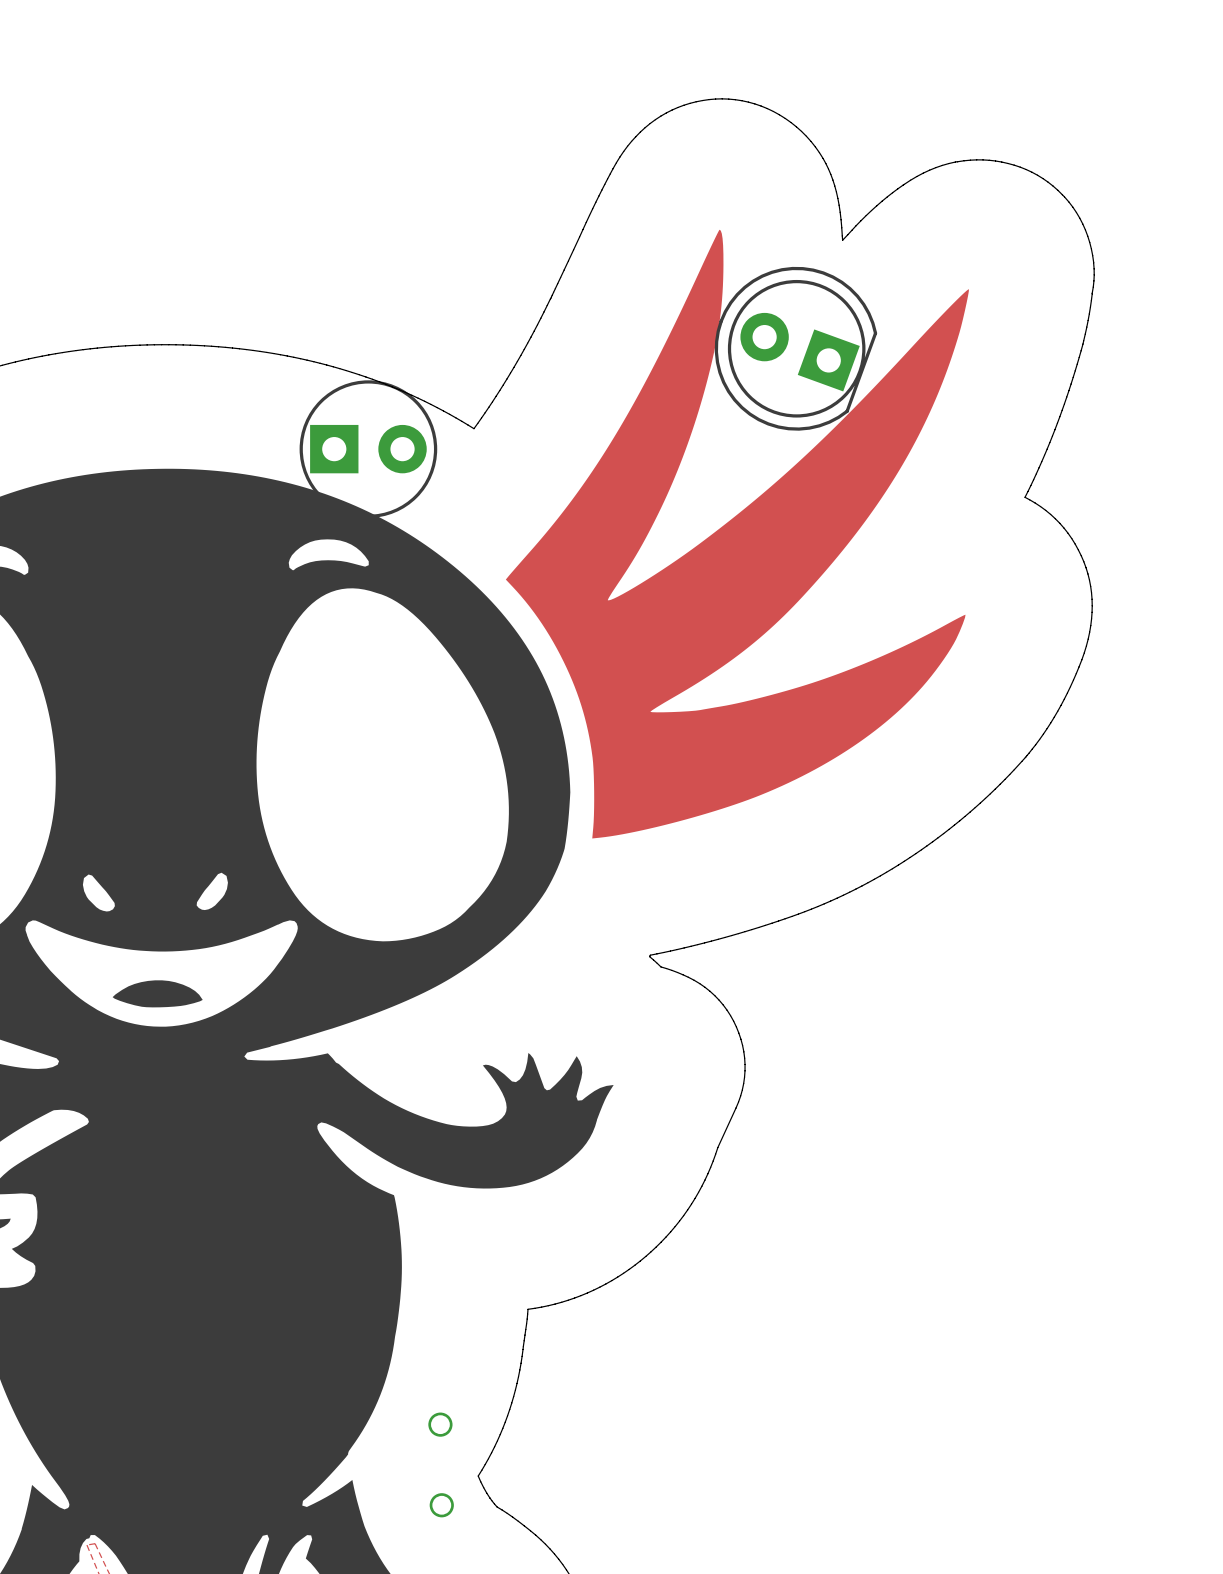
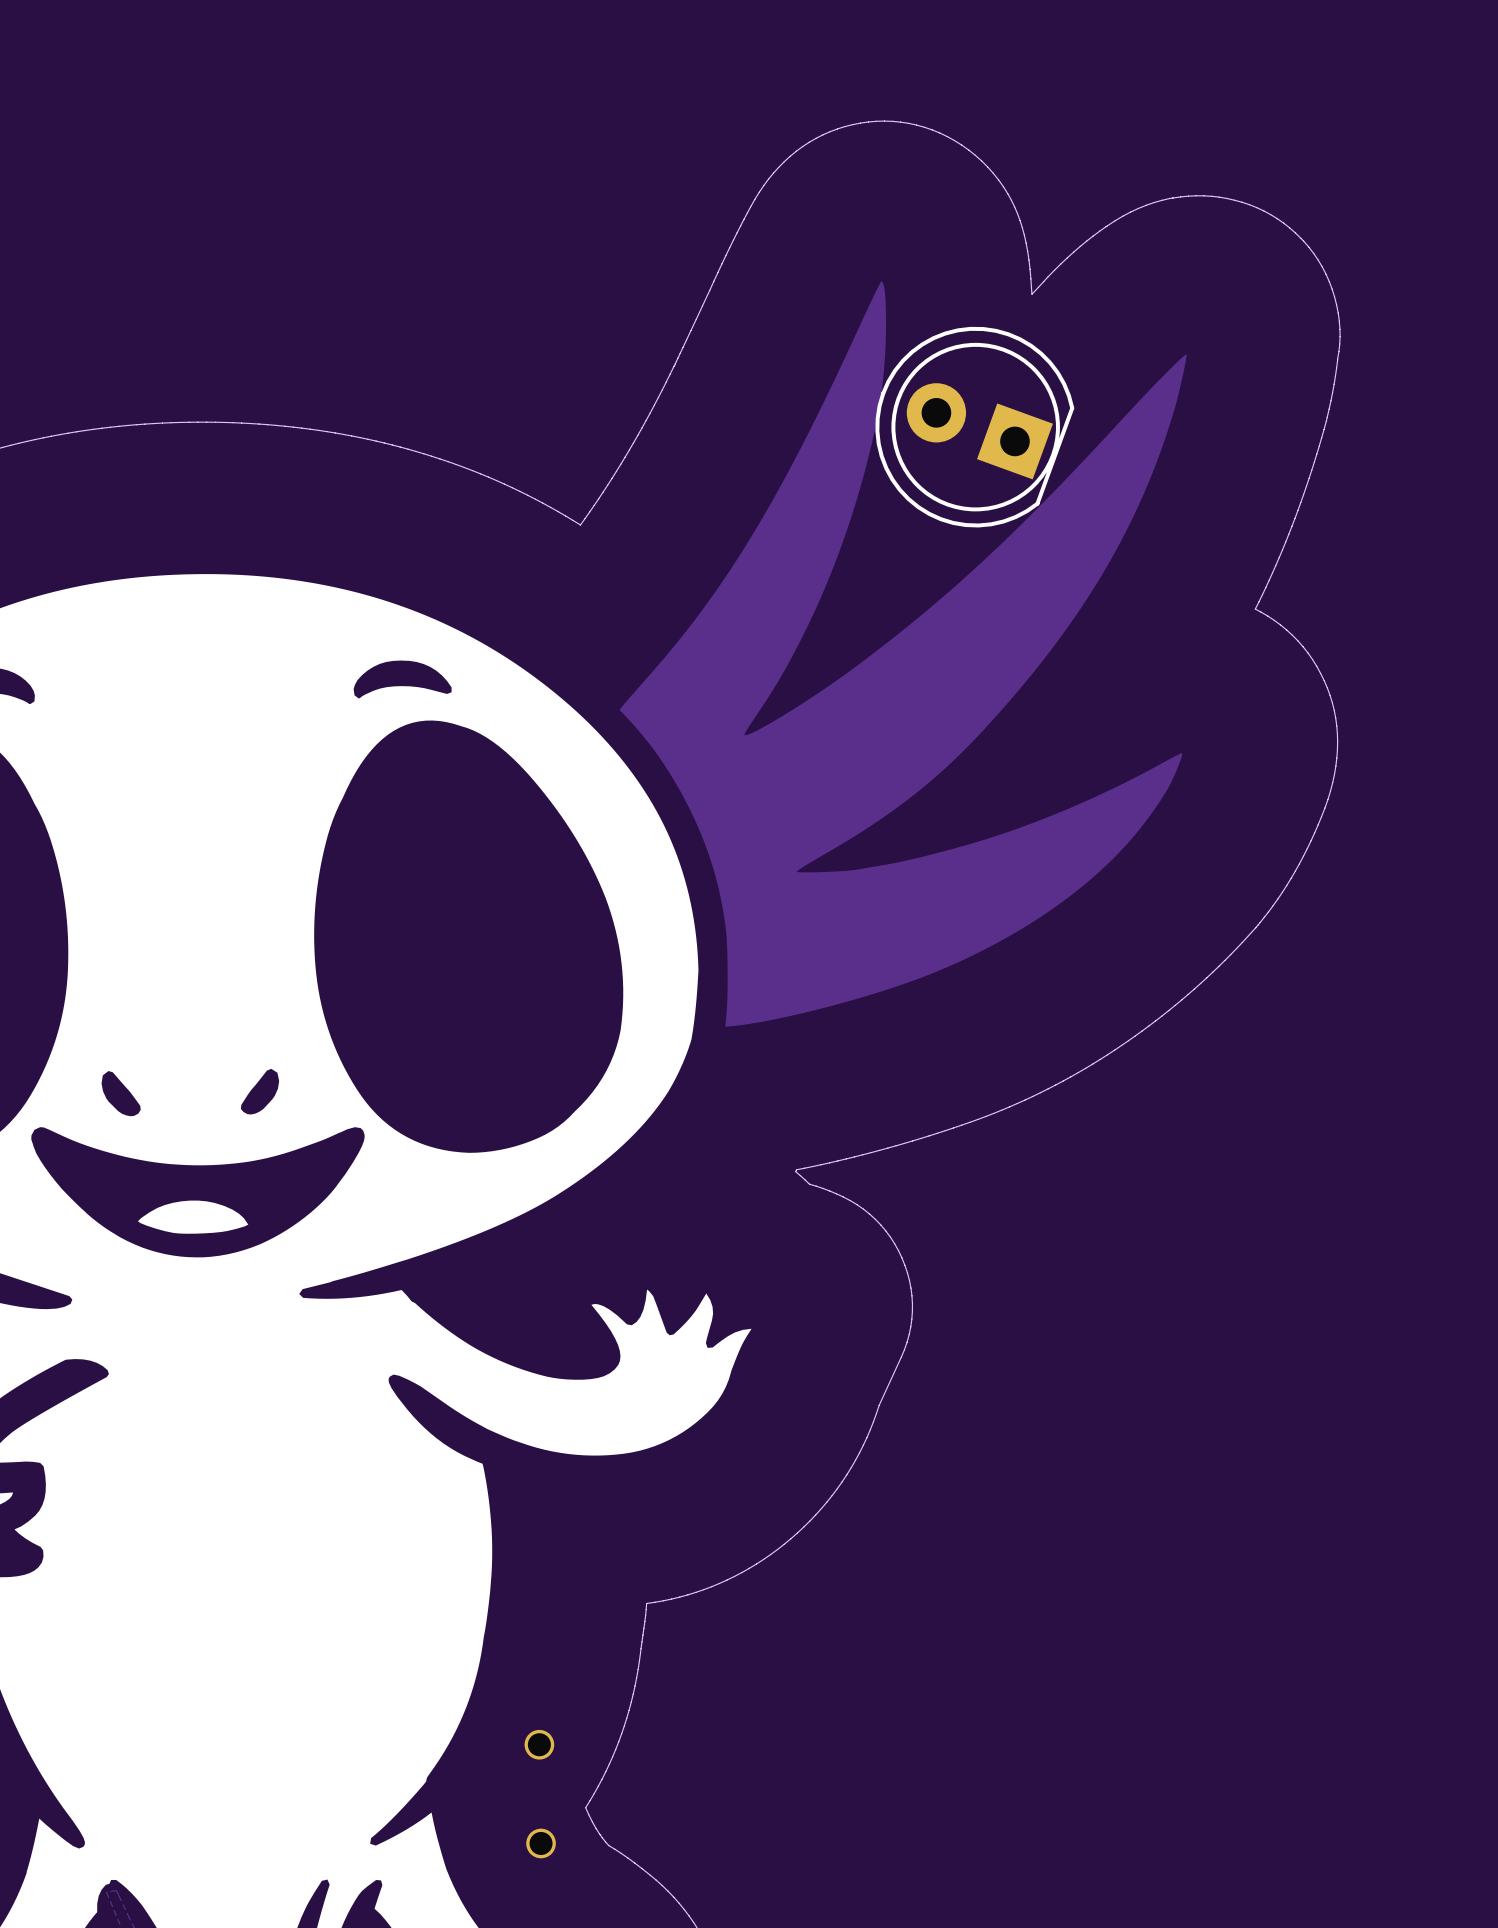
part: (368, 449) -> none

